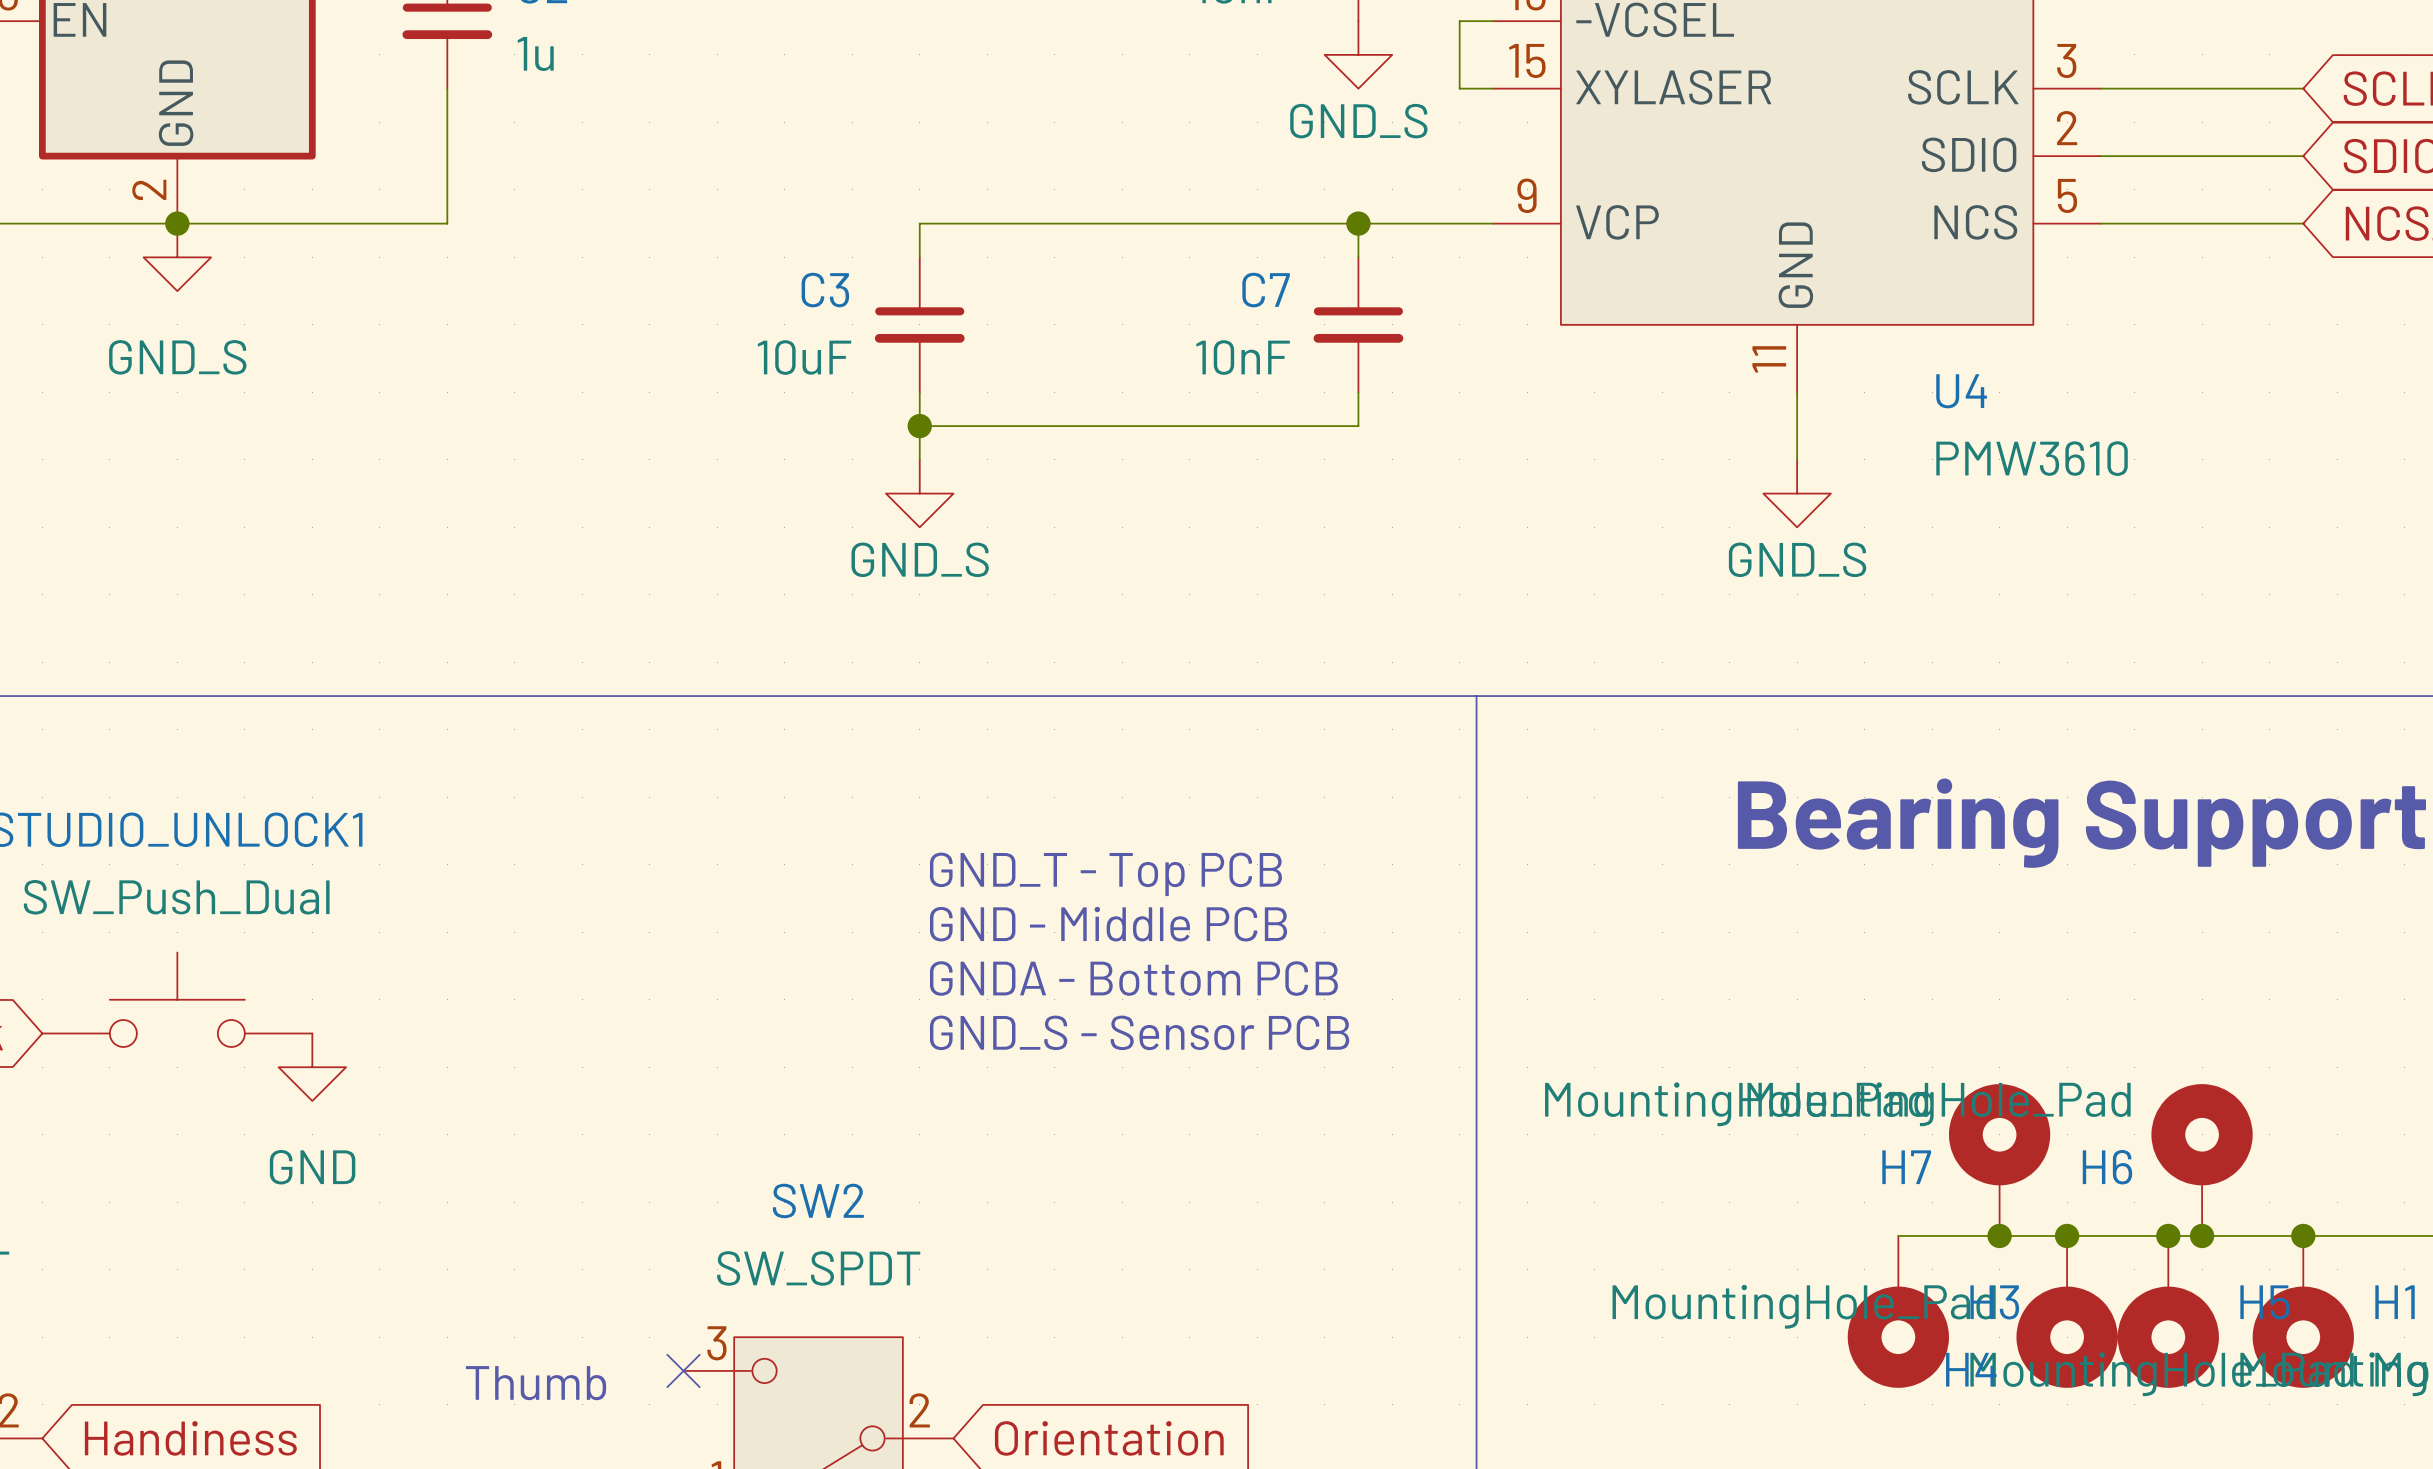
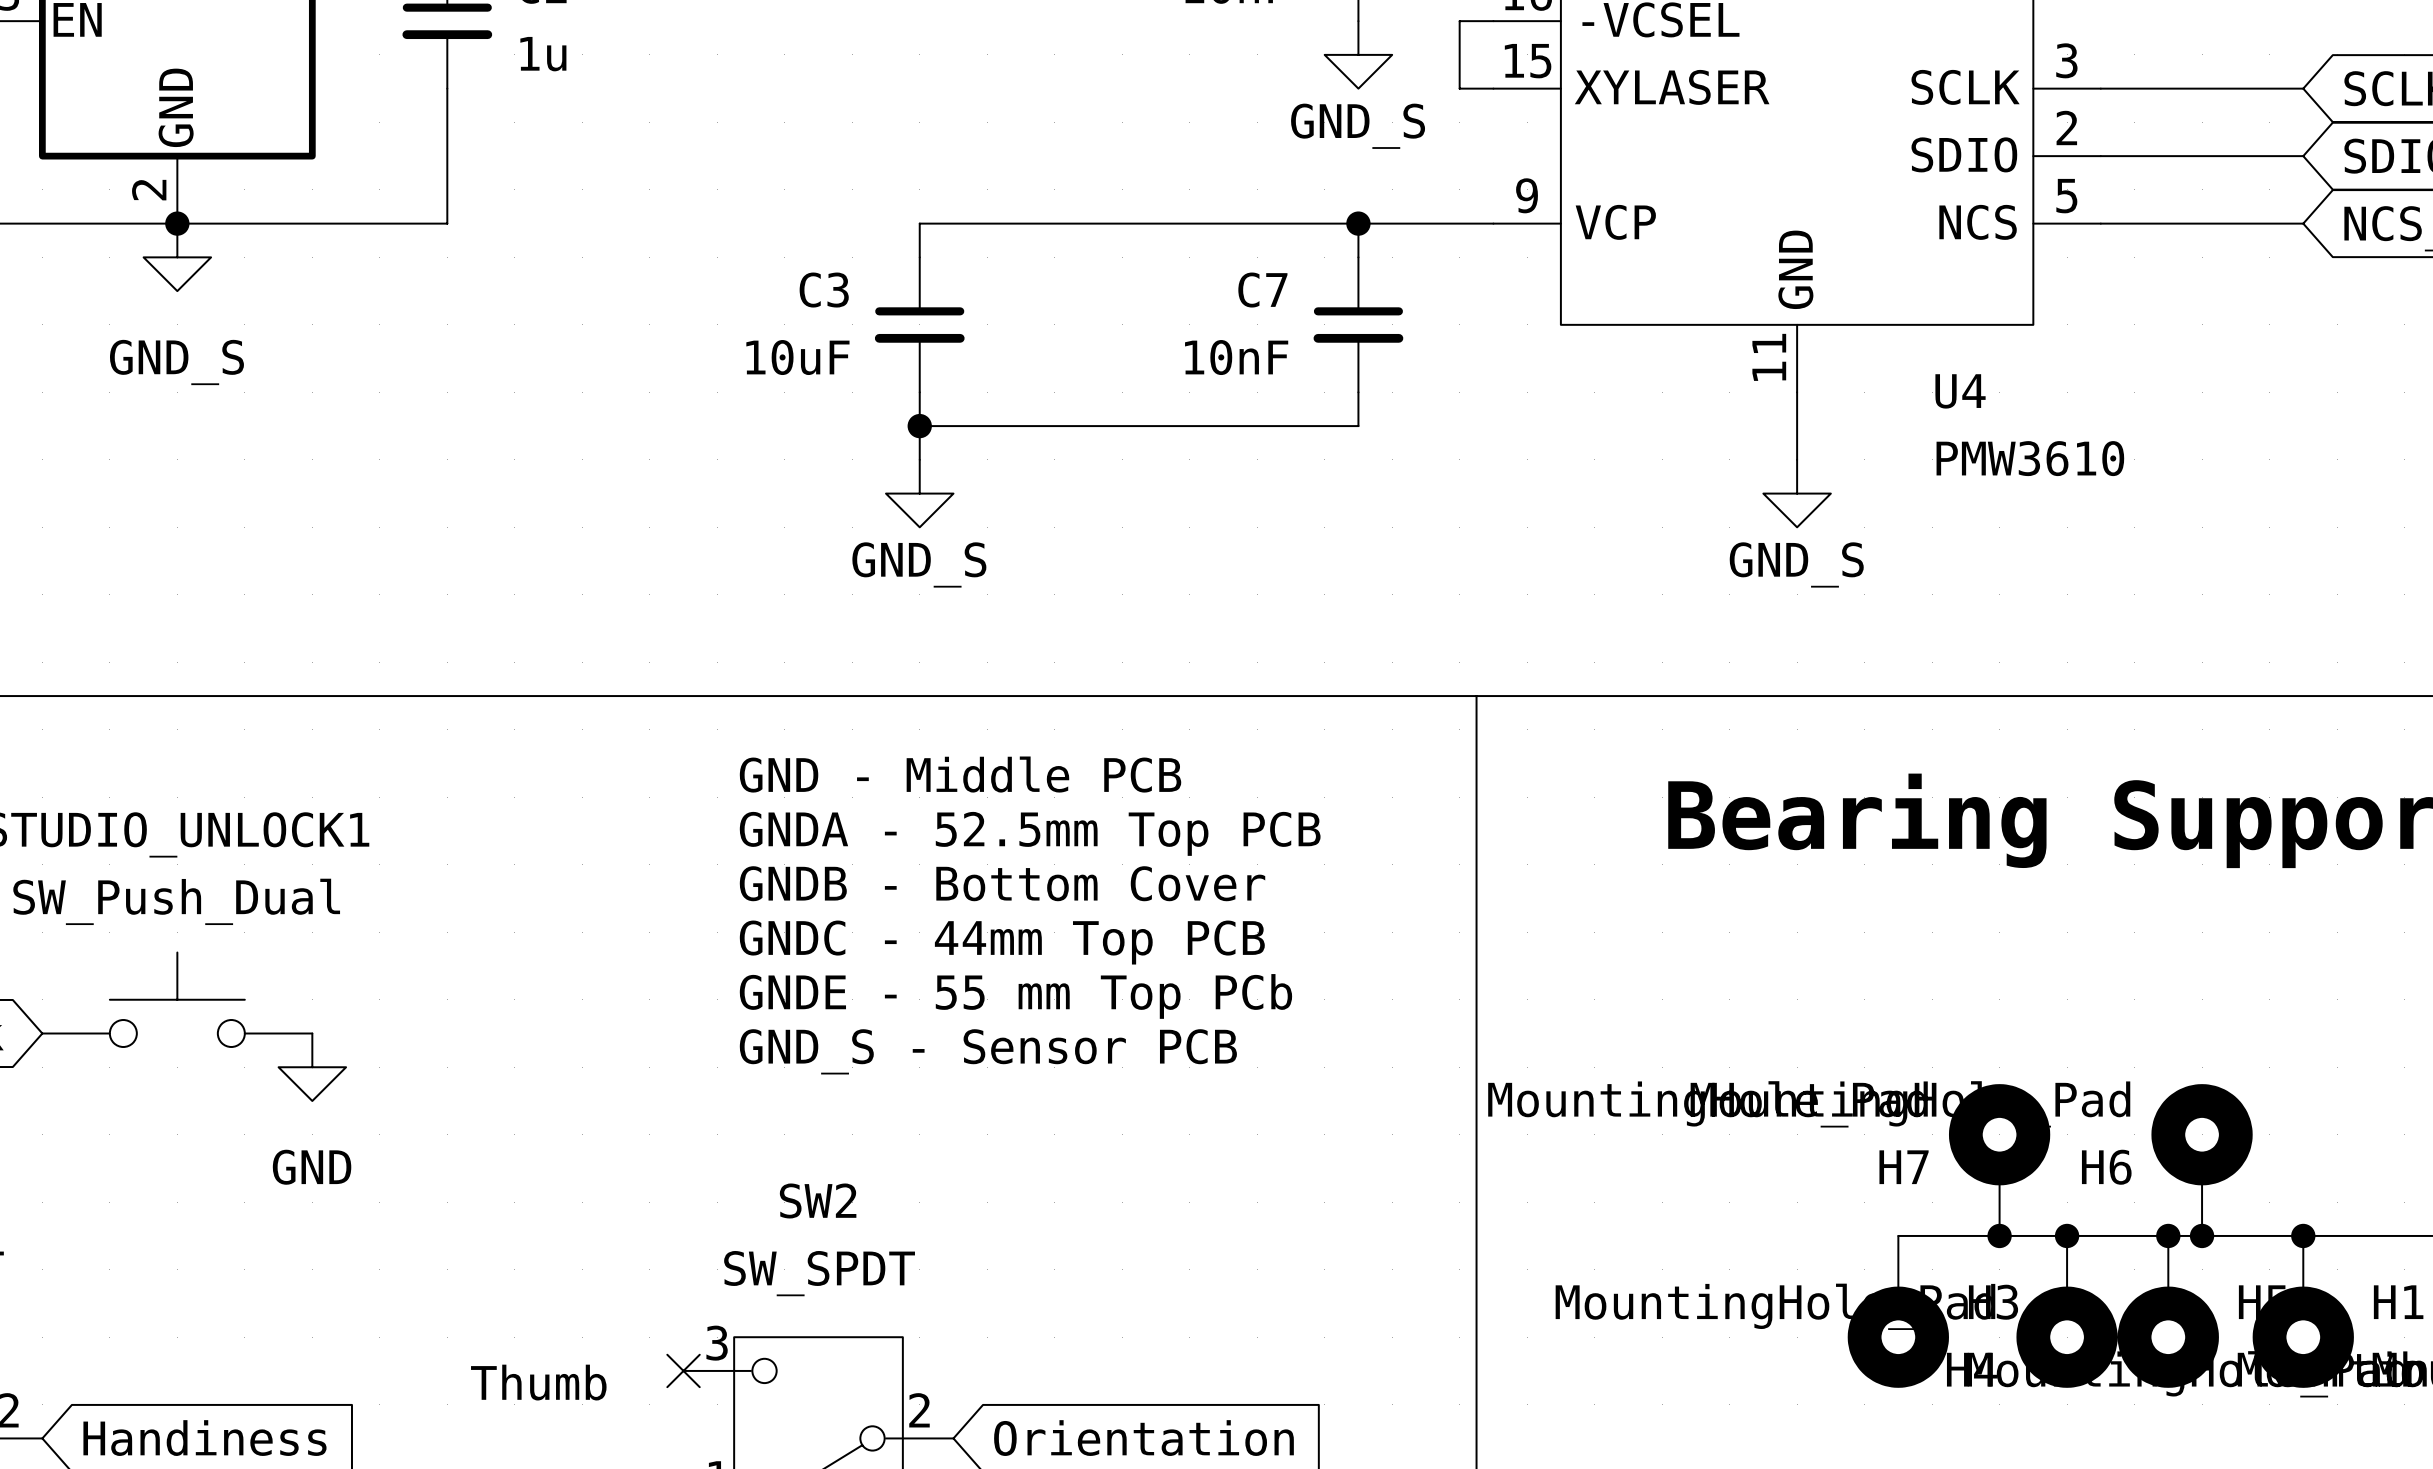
text: none -> GNDA - 52.5mm Top PCB (1030, 833)
text: GND_T - Top PCB (1105, 874) -> none
text: none -> GNDB - Bottom Cover (1002, 883)
text position: GND - Middle PCB (1108, 924) -> GND - Middle PCB (960, 774)
text: none -> GNDC - 44mm Top PCB (1002, 942)
text: GNDA - Bottom PCB (1133, 978) -> none
text: none -> GNDE - 55 mm Top PCb (1015, 996)
text position: GND_S - Sensor PCB (1139, 1032) -> GND_S - Sensor PCB (988, 1051)

